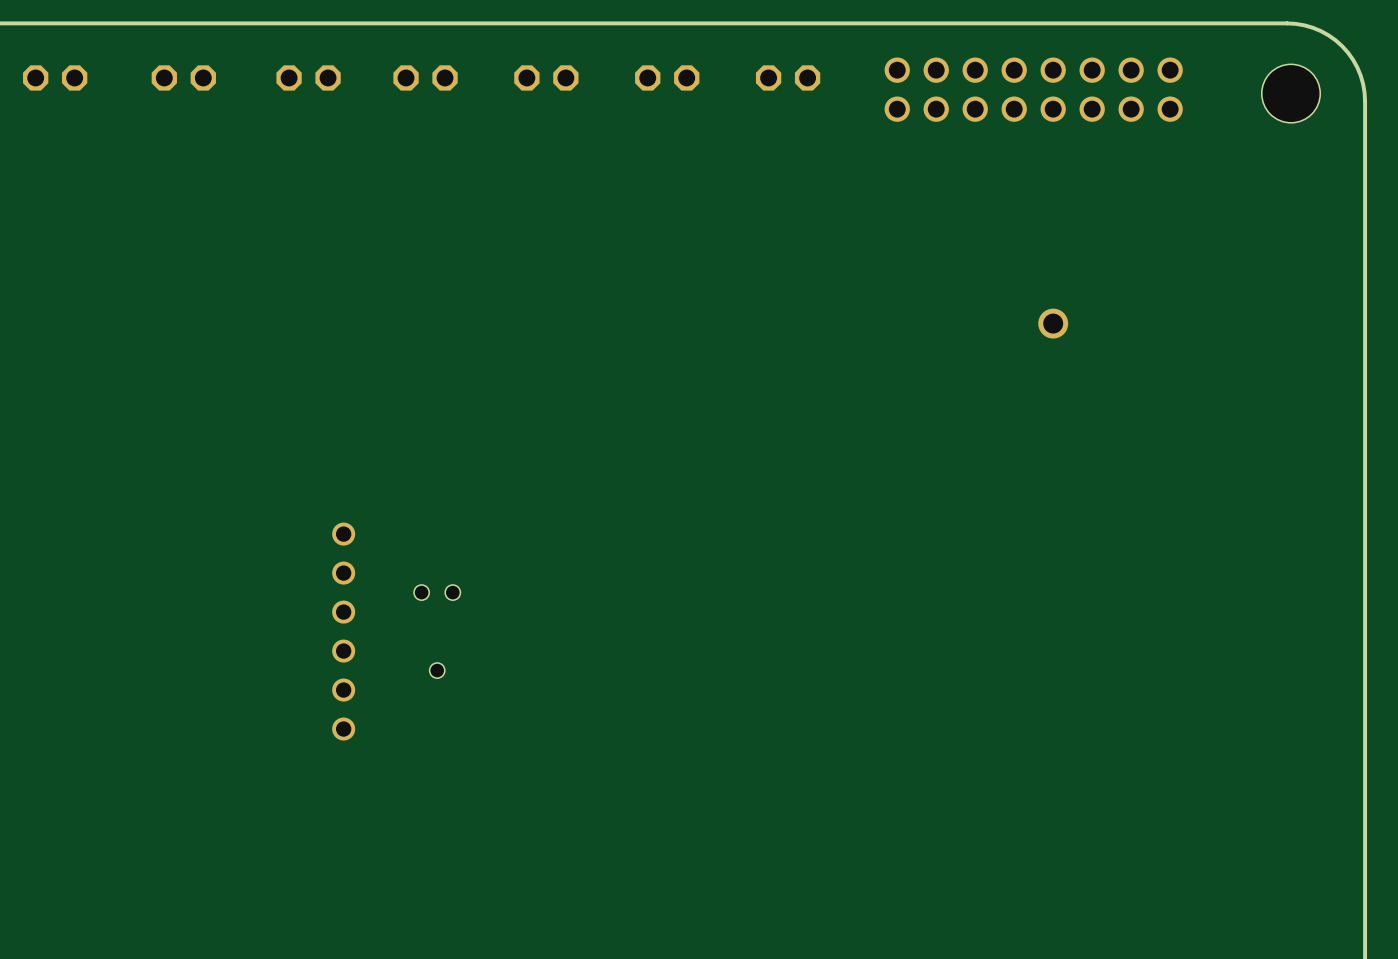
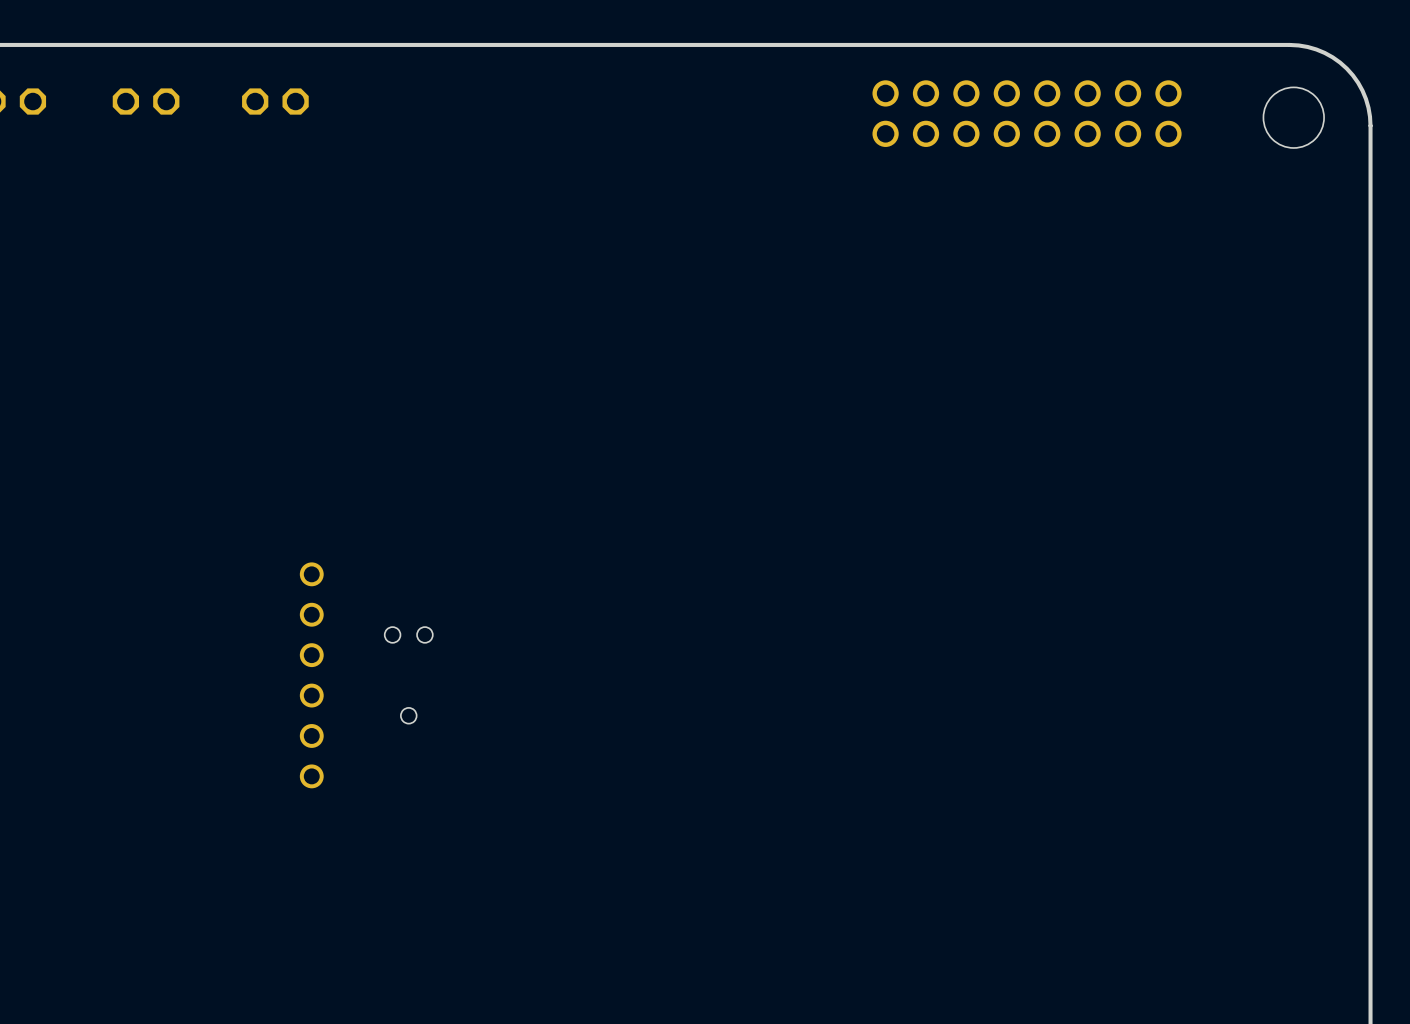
part: (425, 77) -> none
part: (546, 77) -> none
part: (667, 77) -> none
part: (788, 77) -> none
part: (1053, 323) -> none

